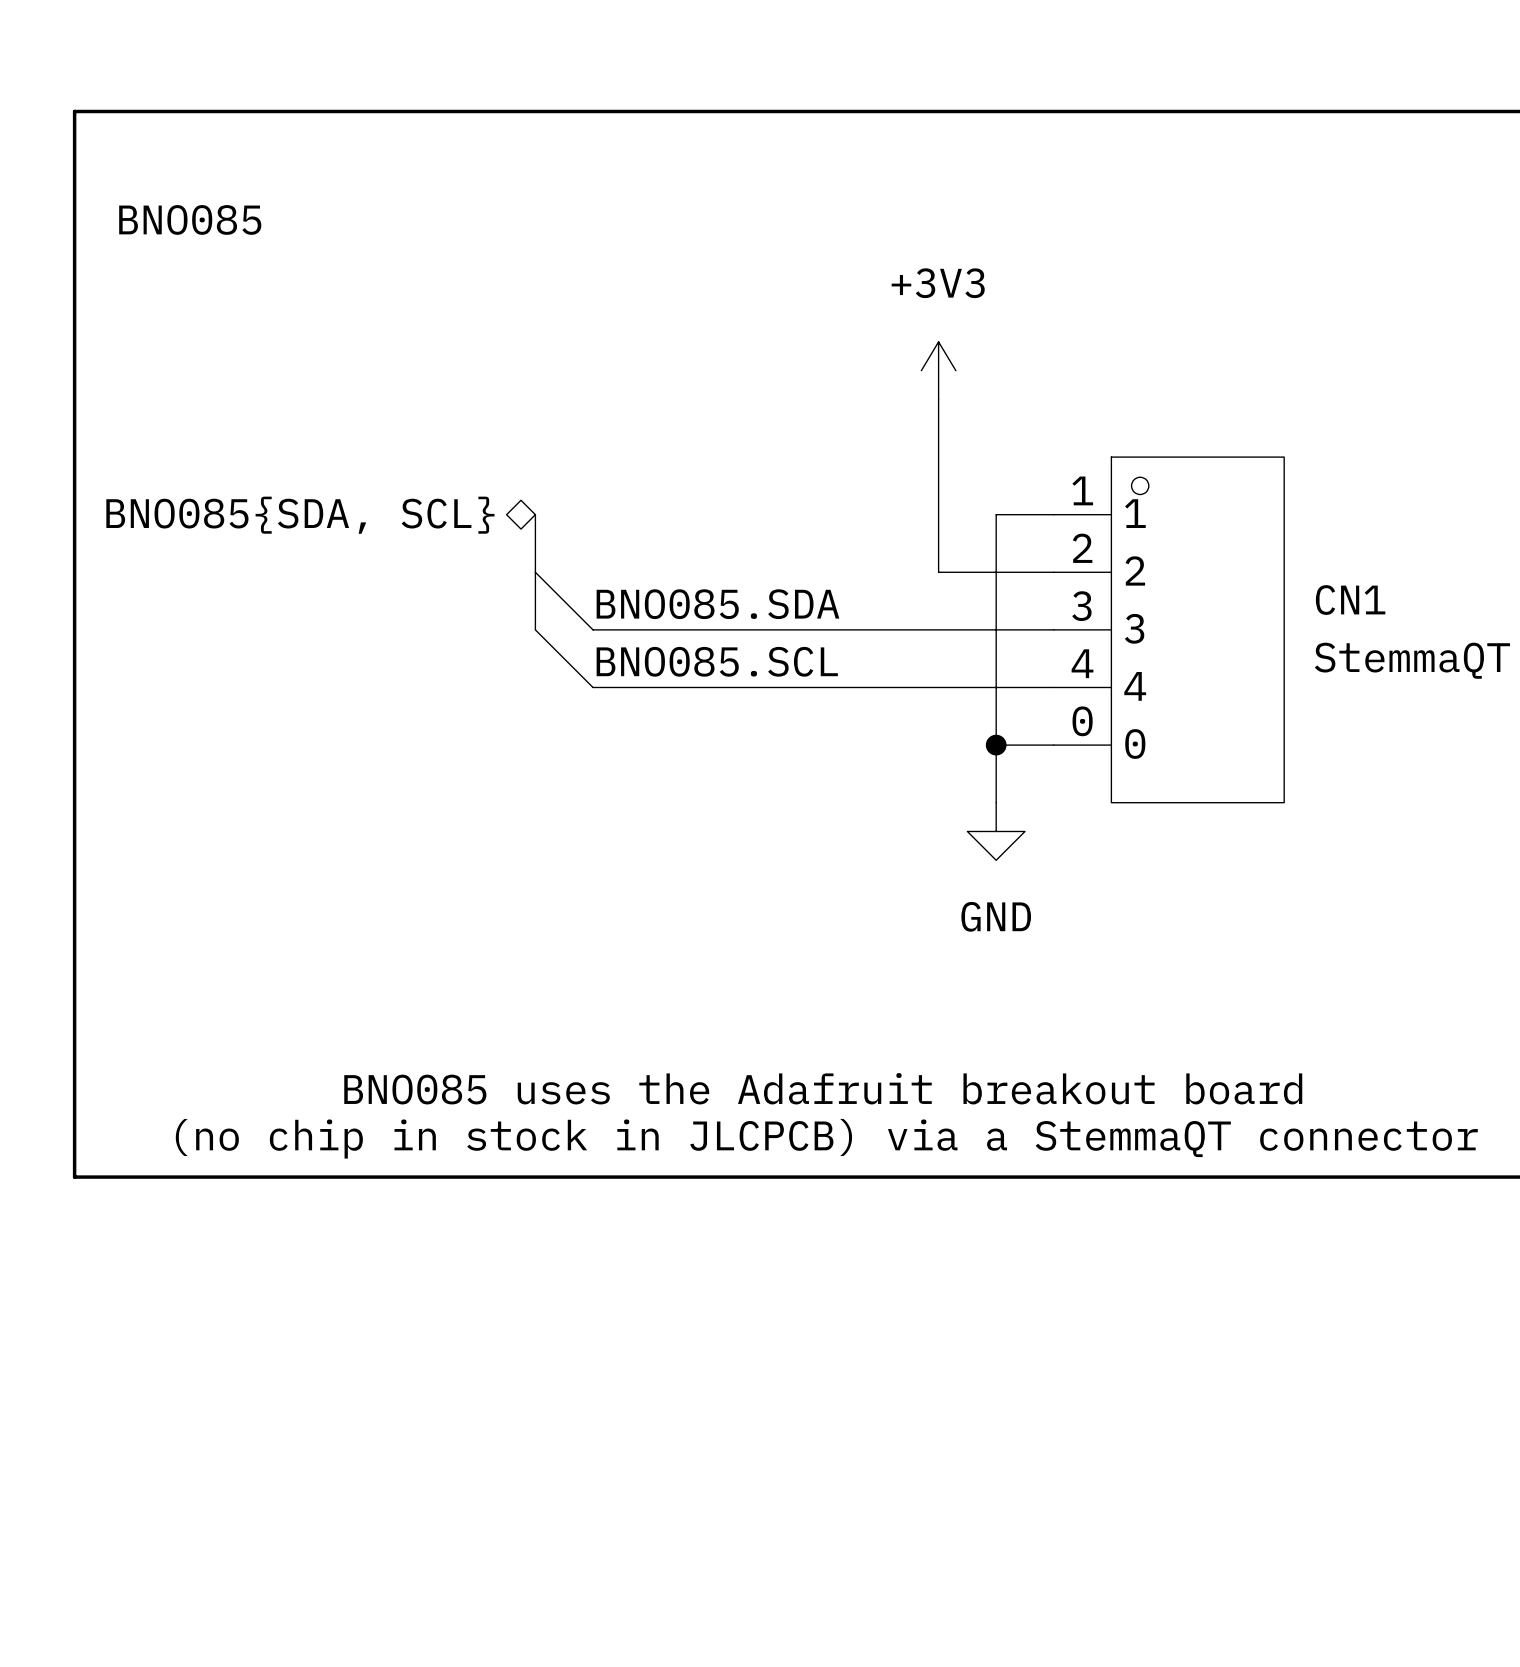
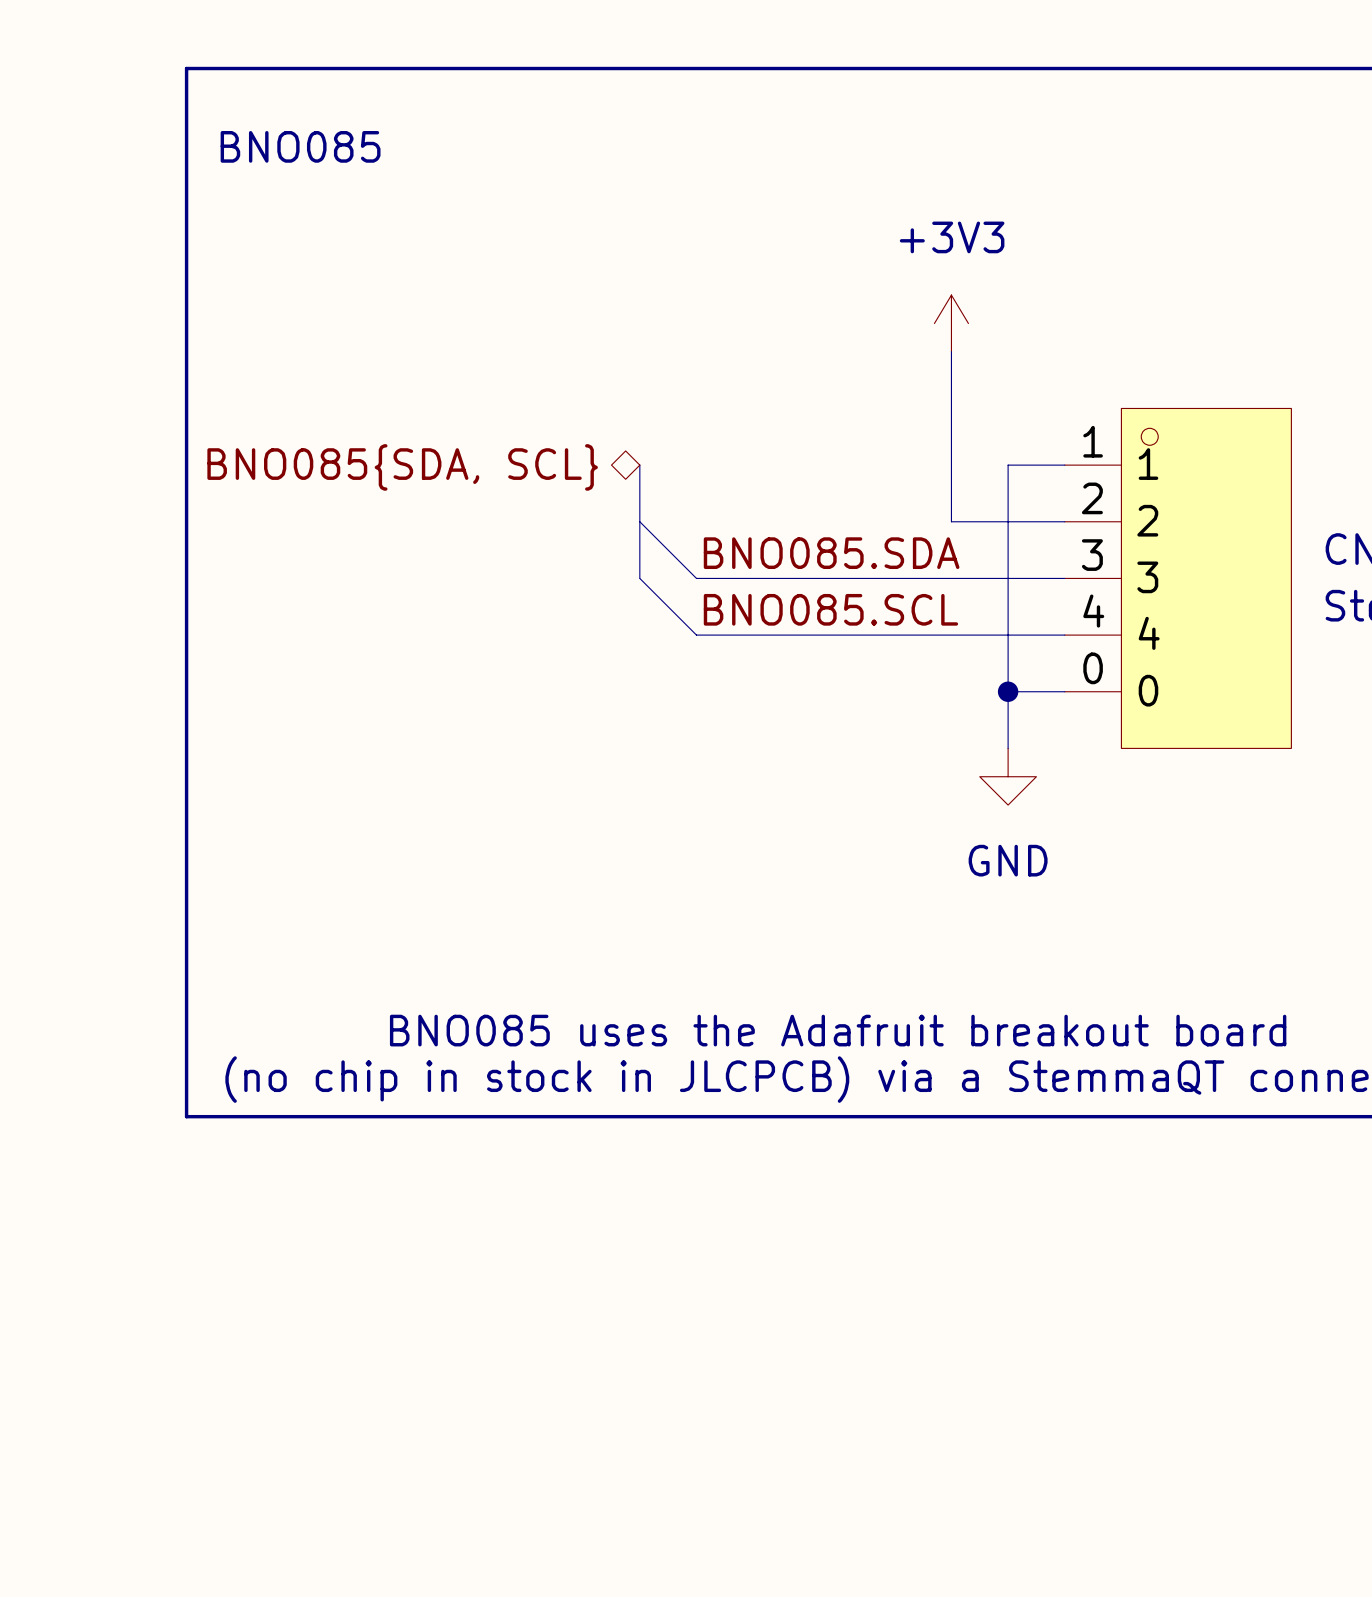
line: (161, 111) (74, 111) (74, 1177) (161, 1177) -> (186, 68) (186, 1116)
text position: BNO085 (190, 219) -> BNO085 (300, 146)
bus: (535, 514) (535, 629) -> (639, 465) (639, 578)
hierarchical label position: BNO085{SDA, SCL} (300, 515) -> BNO085{SDA, SCL} (402, 467)
wire: (535, 572) (593, 629) (679, 629) -> (639, 521) (696, 578)
label position: BNO085.SDA (717, 604) -> BNO085.SDA (831, 553)
wire: (535, 629) (593, 687) (679, 687) -> (639, 578) (696, 635)
label position: BNO085.SCL (717, 661) -> BNO085.SCL (830, 609)

